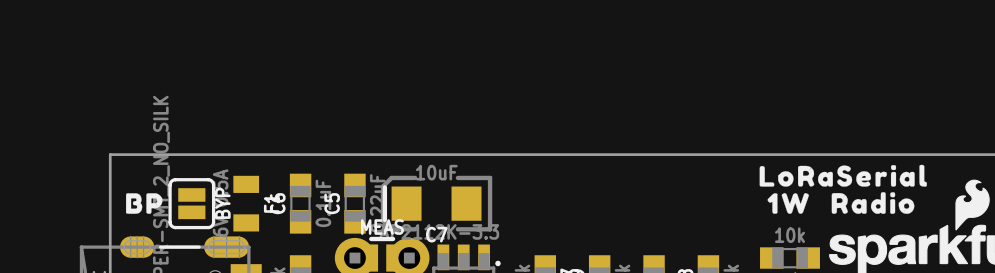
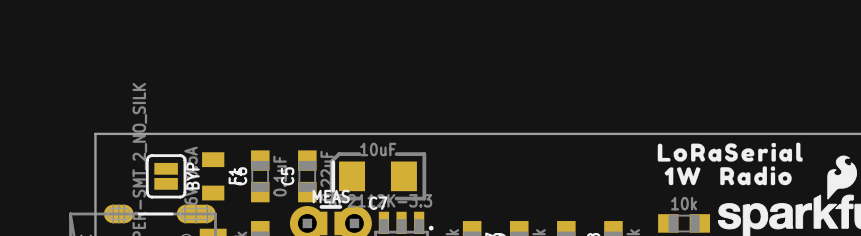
drawing: [126, 193, 163, 214] -> none

